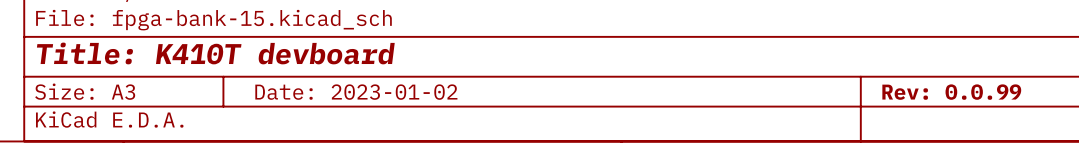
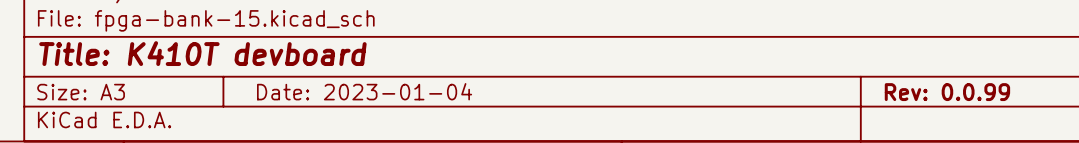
title block: Date: 2023-01-02 (356, 92) -> Date: 2023-01-04 (364, 91)

